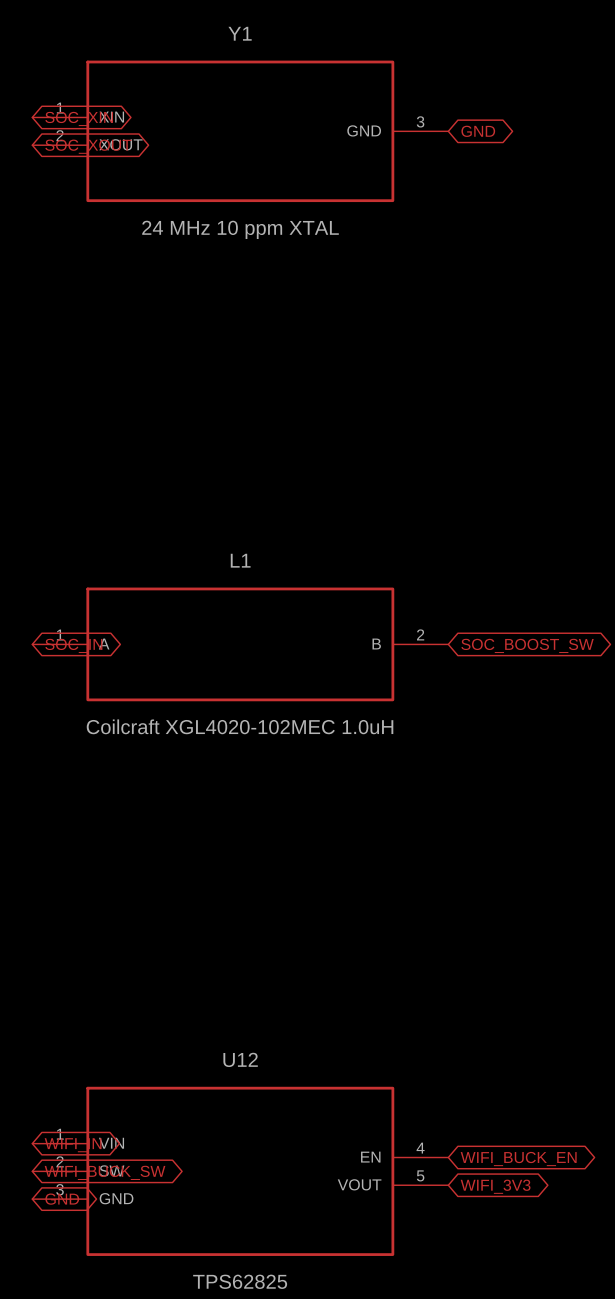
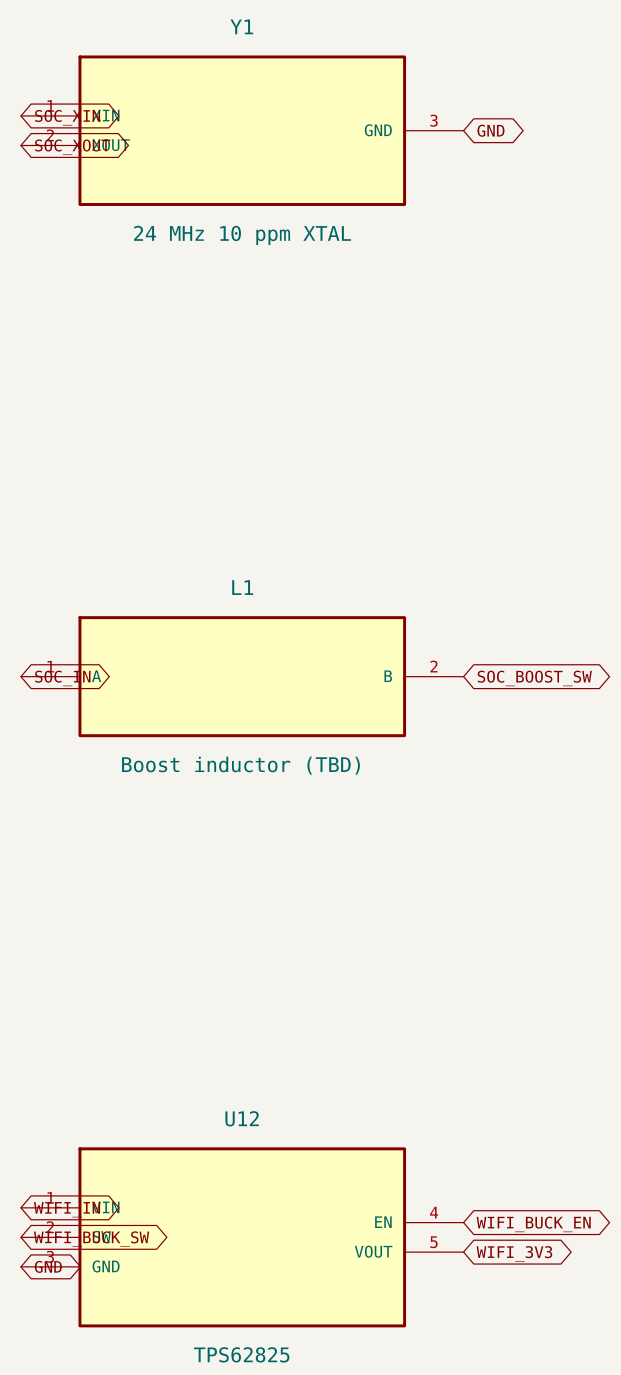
L1 value: Coilcraft XGL4020-102MEC 1.0uH (240, 726) -> Boost inductor (TBD) (240, 765)

